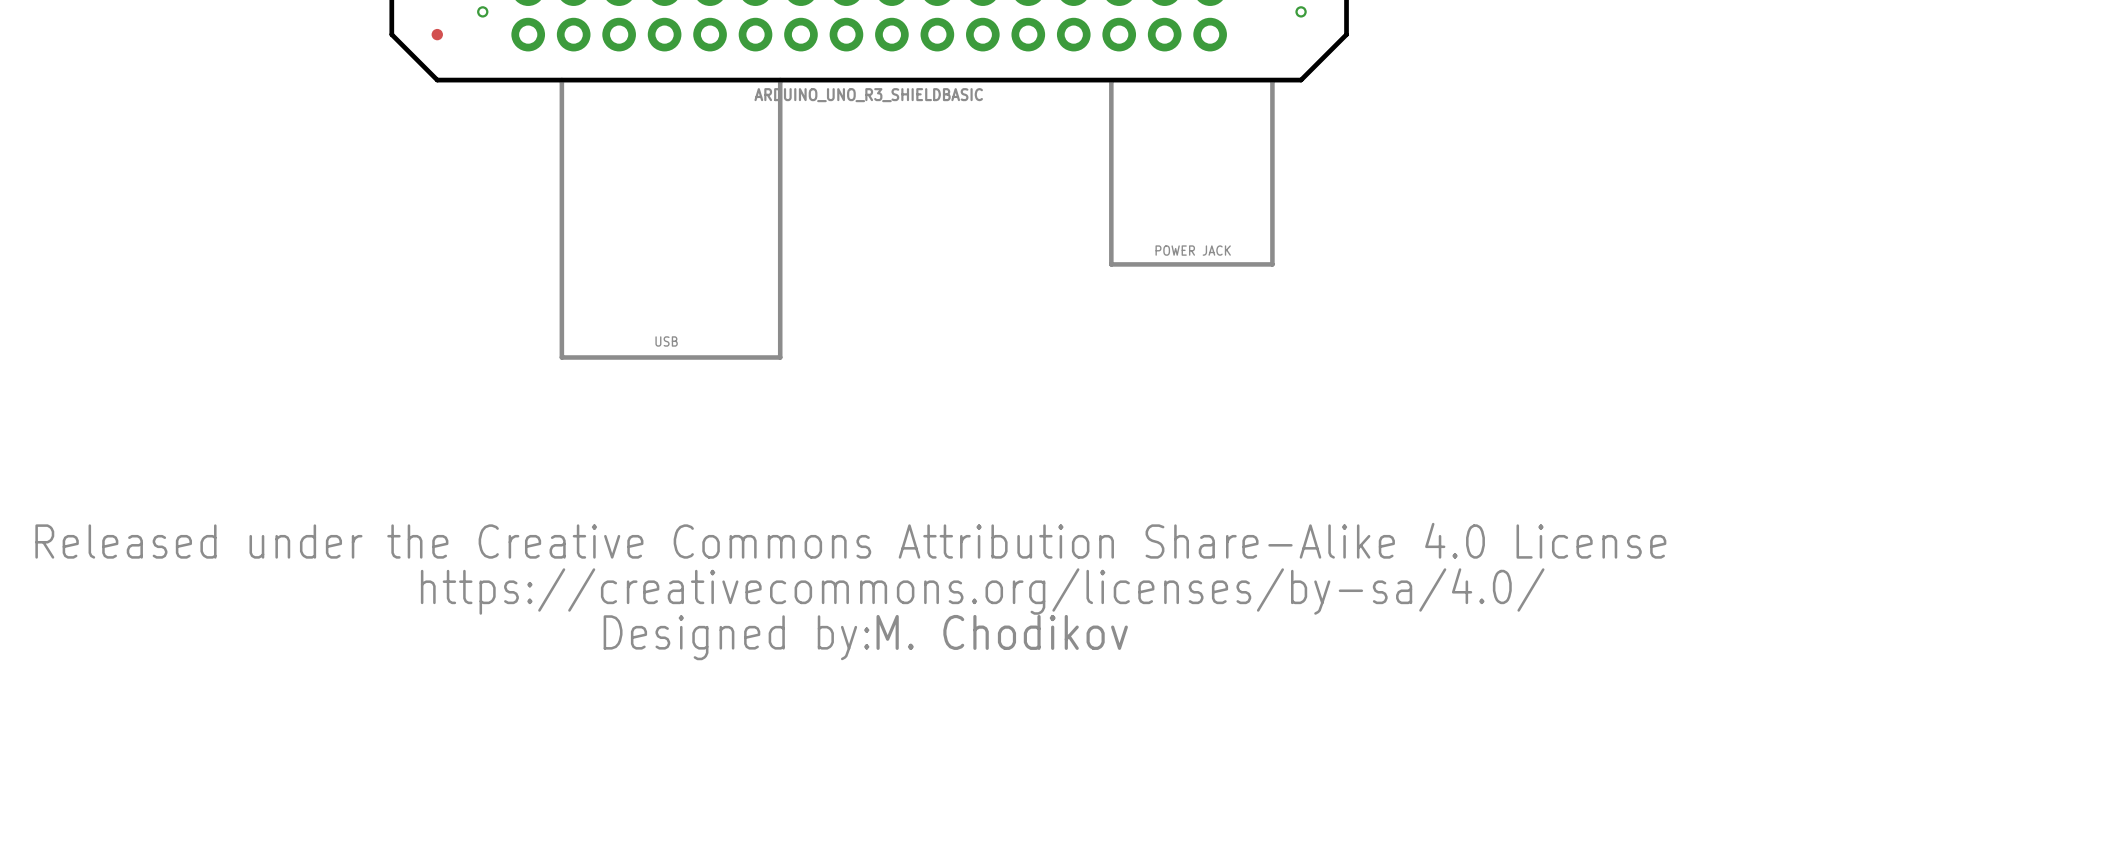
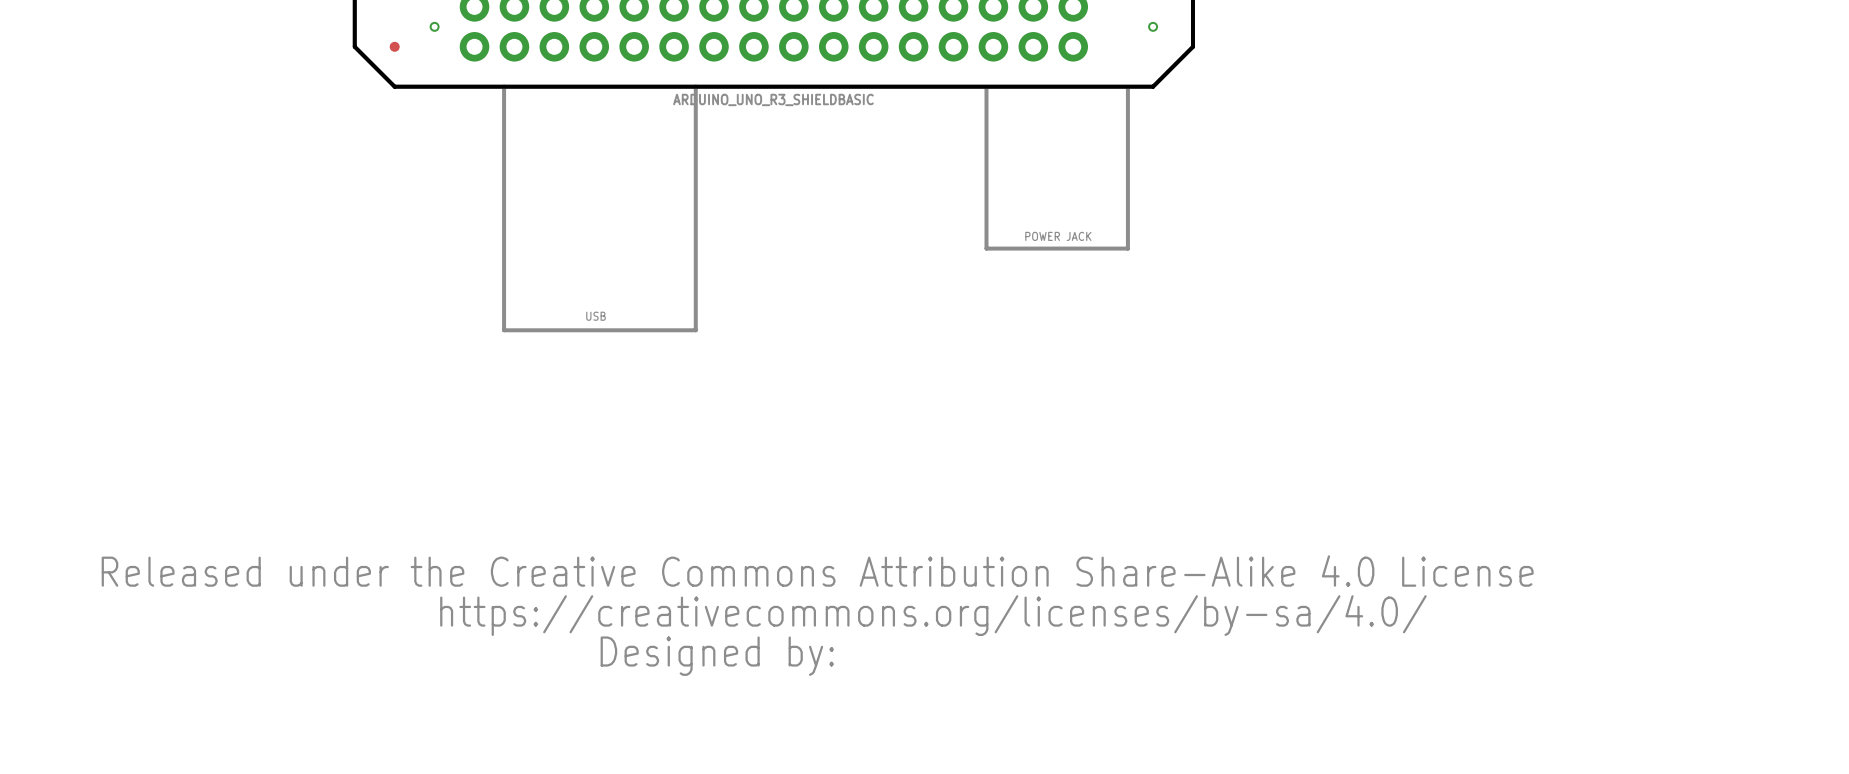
drawing position: (850, 591) -> (817, 615)
text: M. Chodikov (1002, 632) -> none

